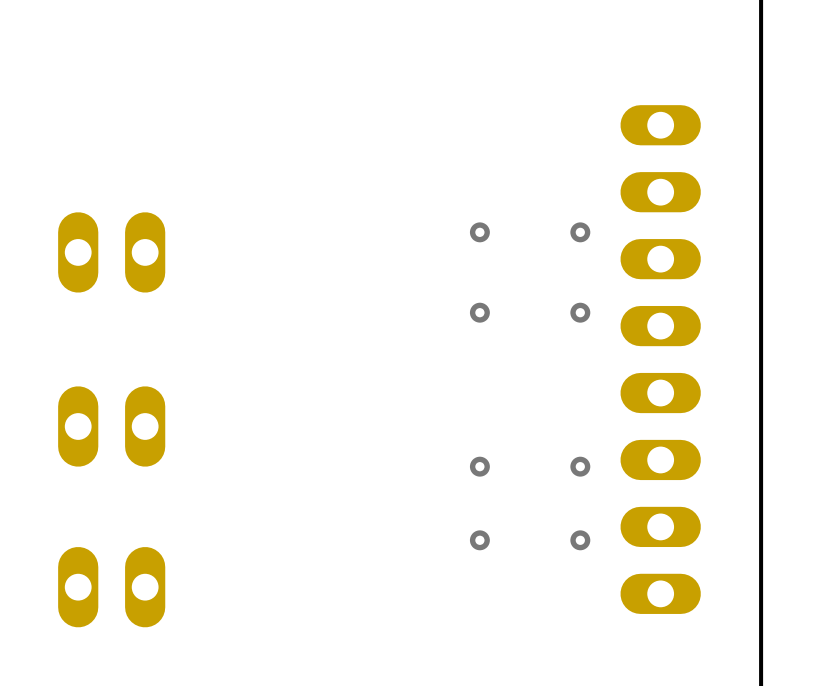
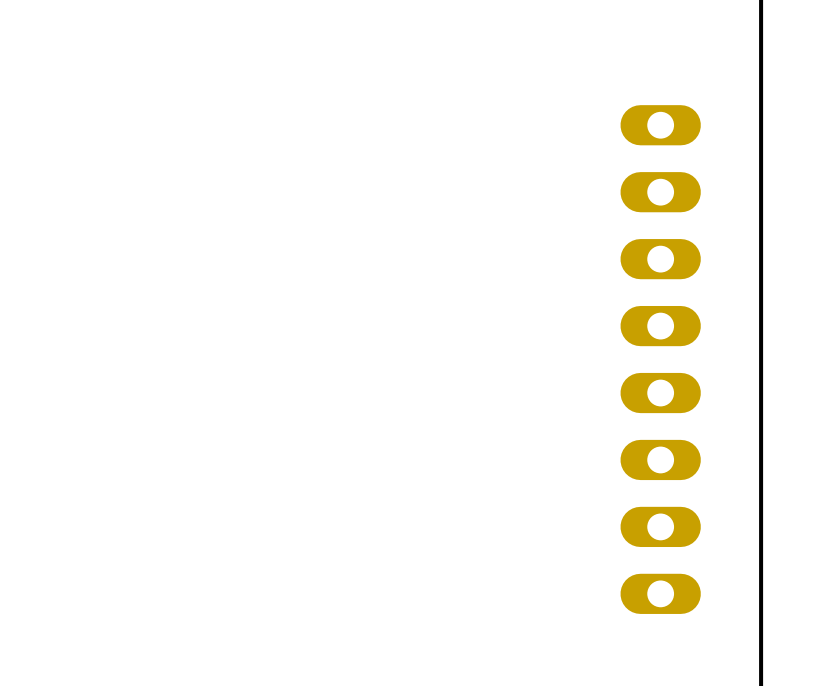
via: (479, 232) -> none
via: (580, 232) -> none
part: (111, 252) -> none
via: (479, 312) -> none
via: (580, 312) -> none
part: (111, 426) -> none
via: (479, 466) -> none
via: (580, 466) -> none
via: (479, 540) -> none
via: (580, 540) -> none
part: (111, 587) -> none

